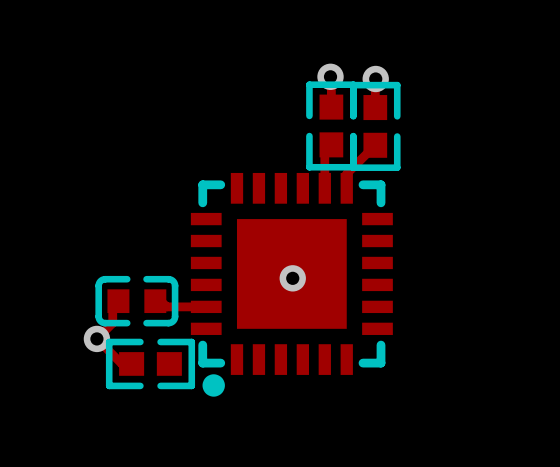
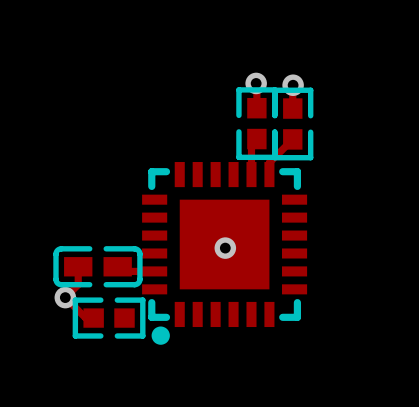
part footprint: [95, 275, 179, 327] -> [53, 246, 143, 288]

